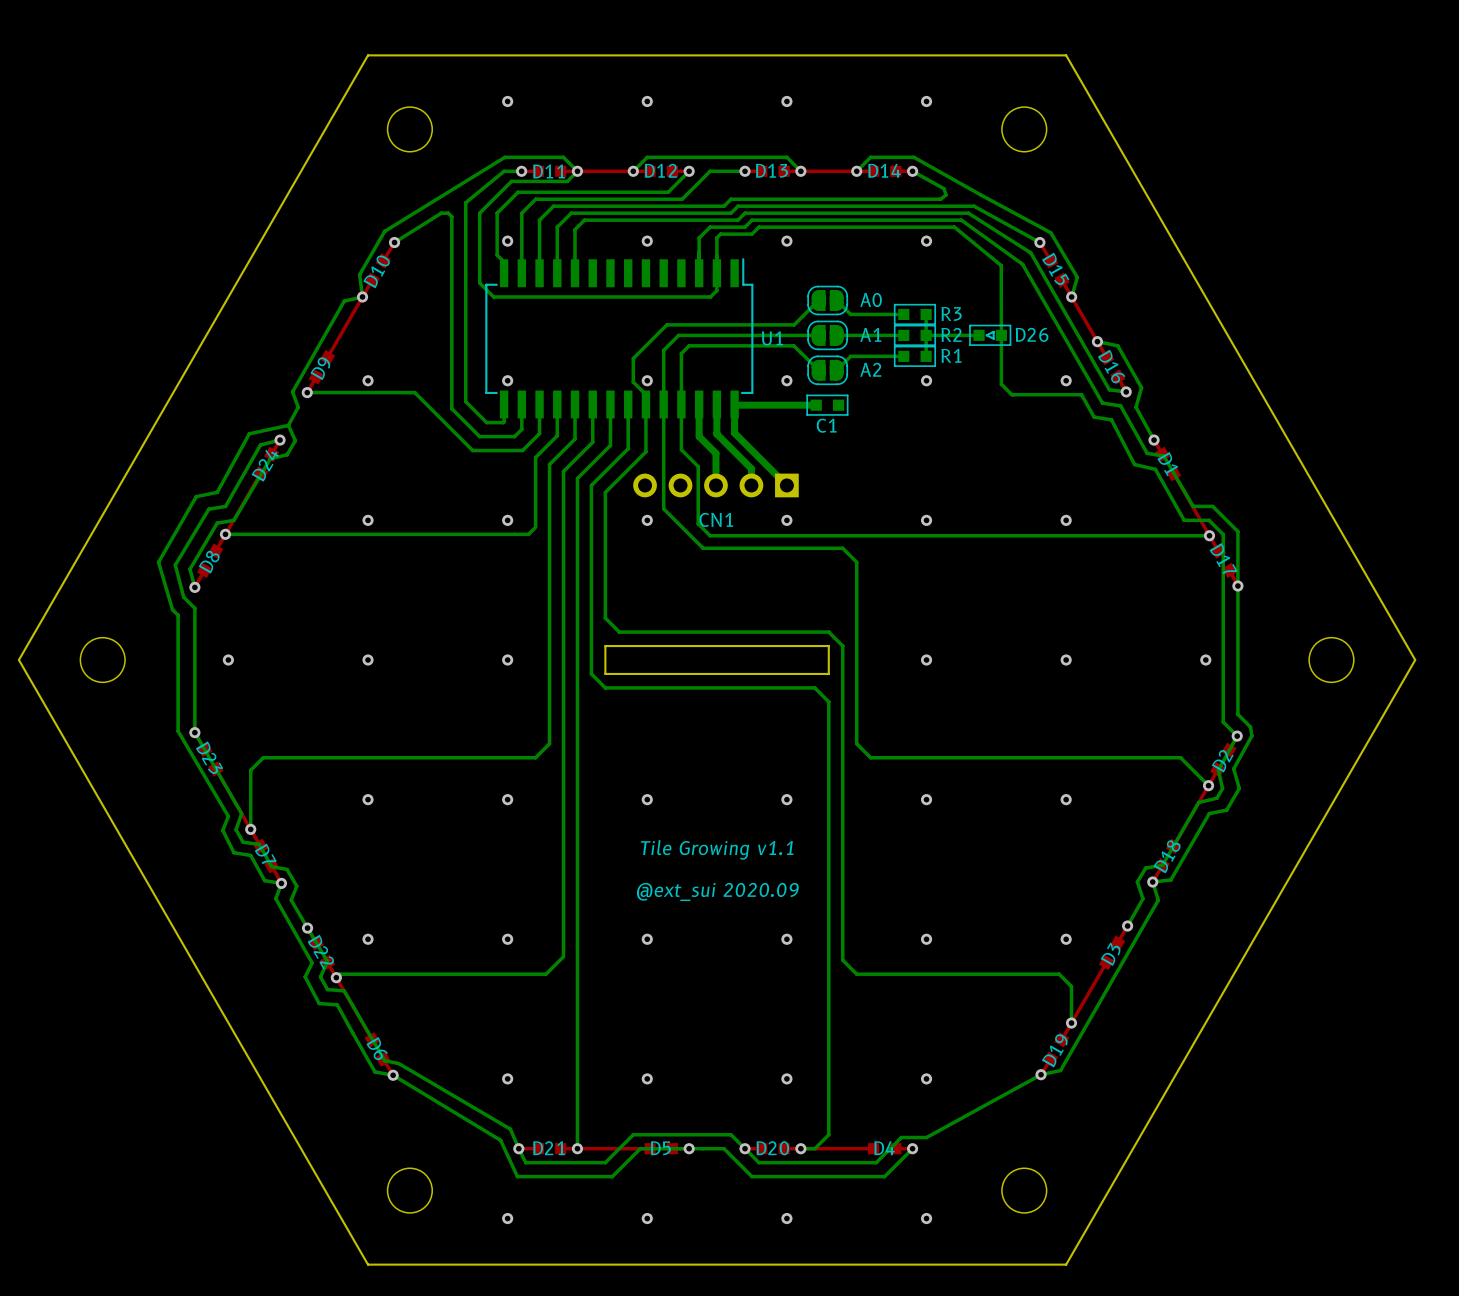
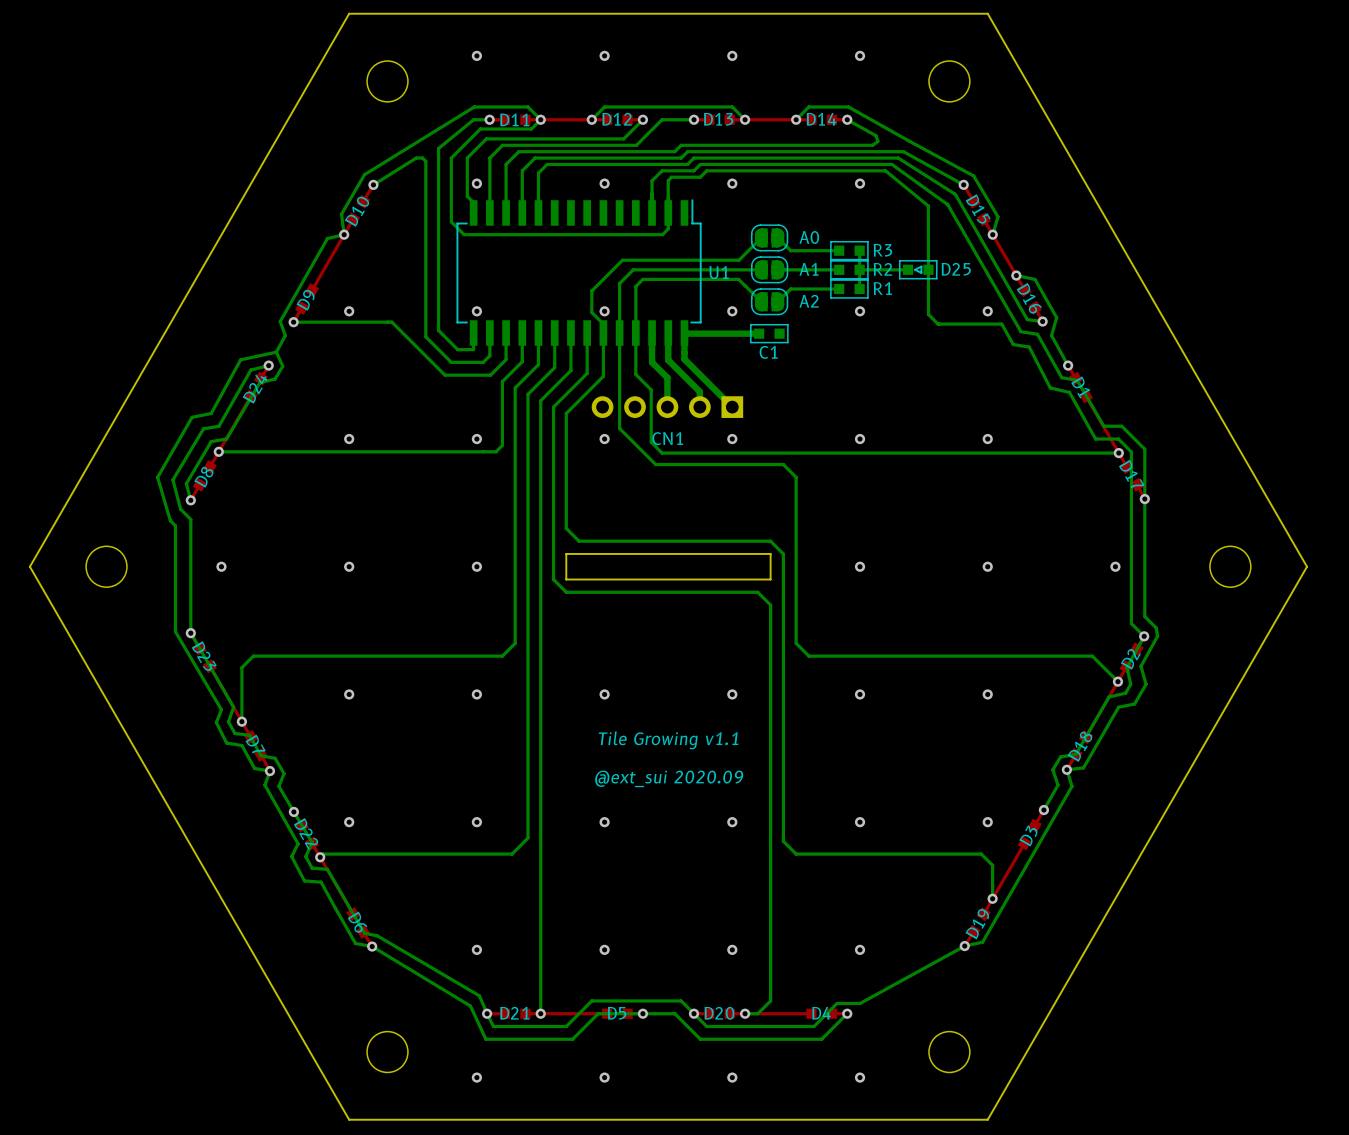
D26 name: D26 (1032, 334) -> D25 (956, 269)

